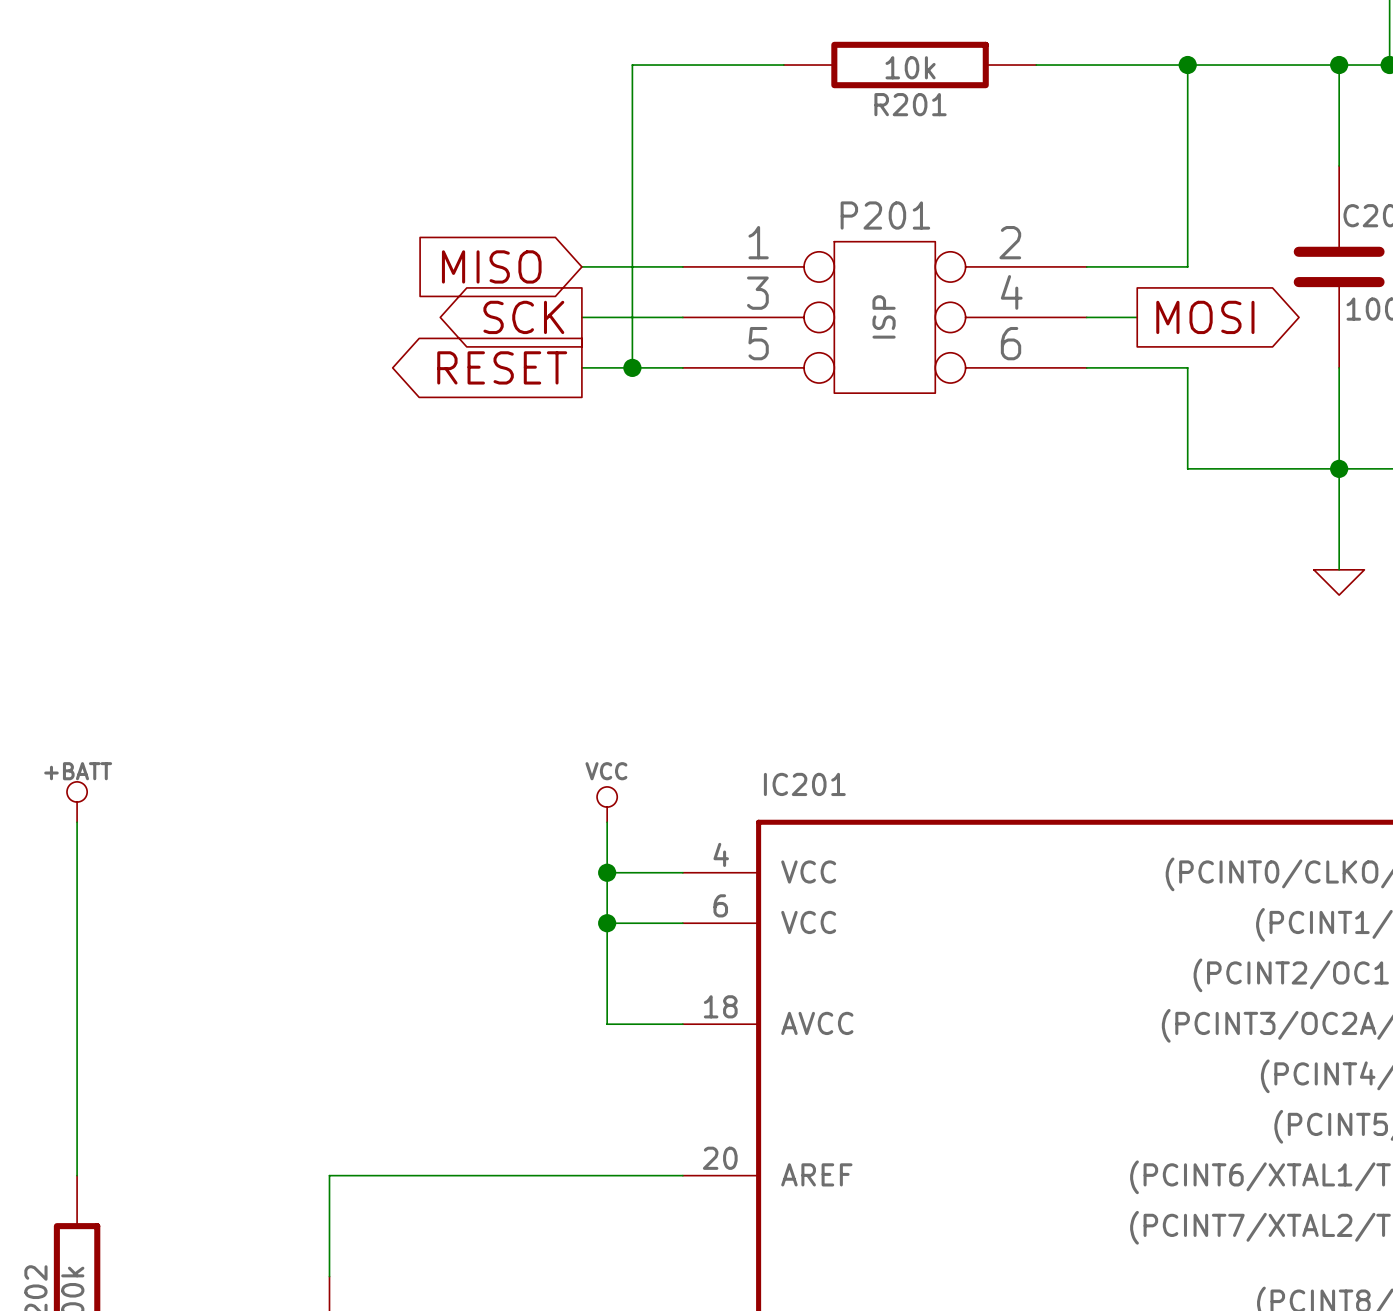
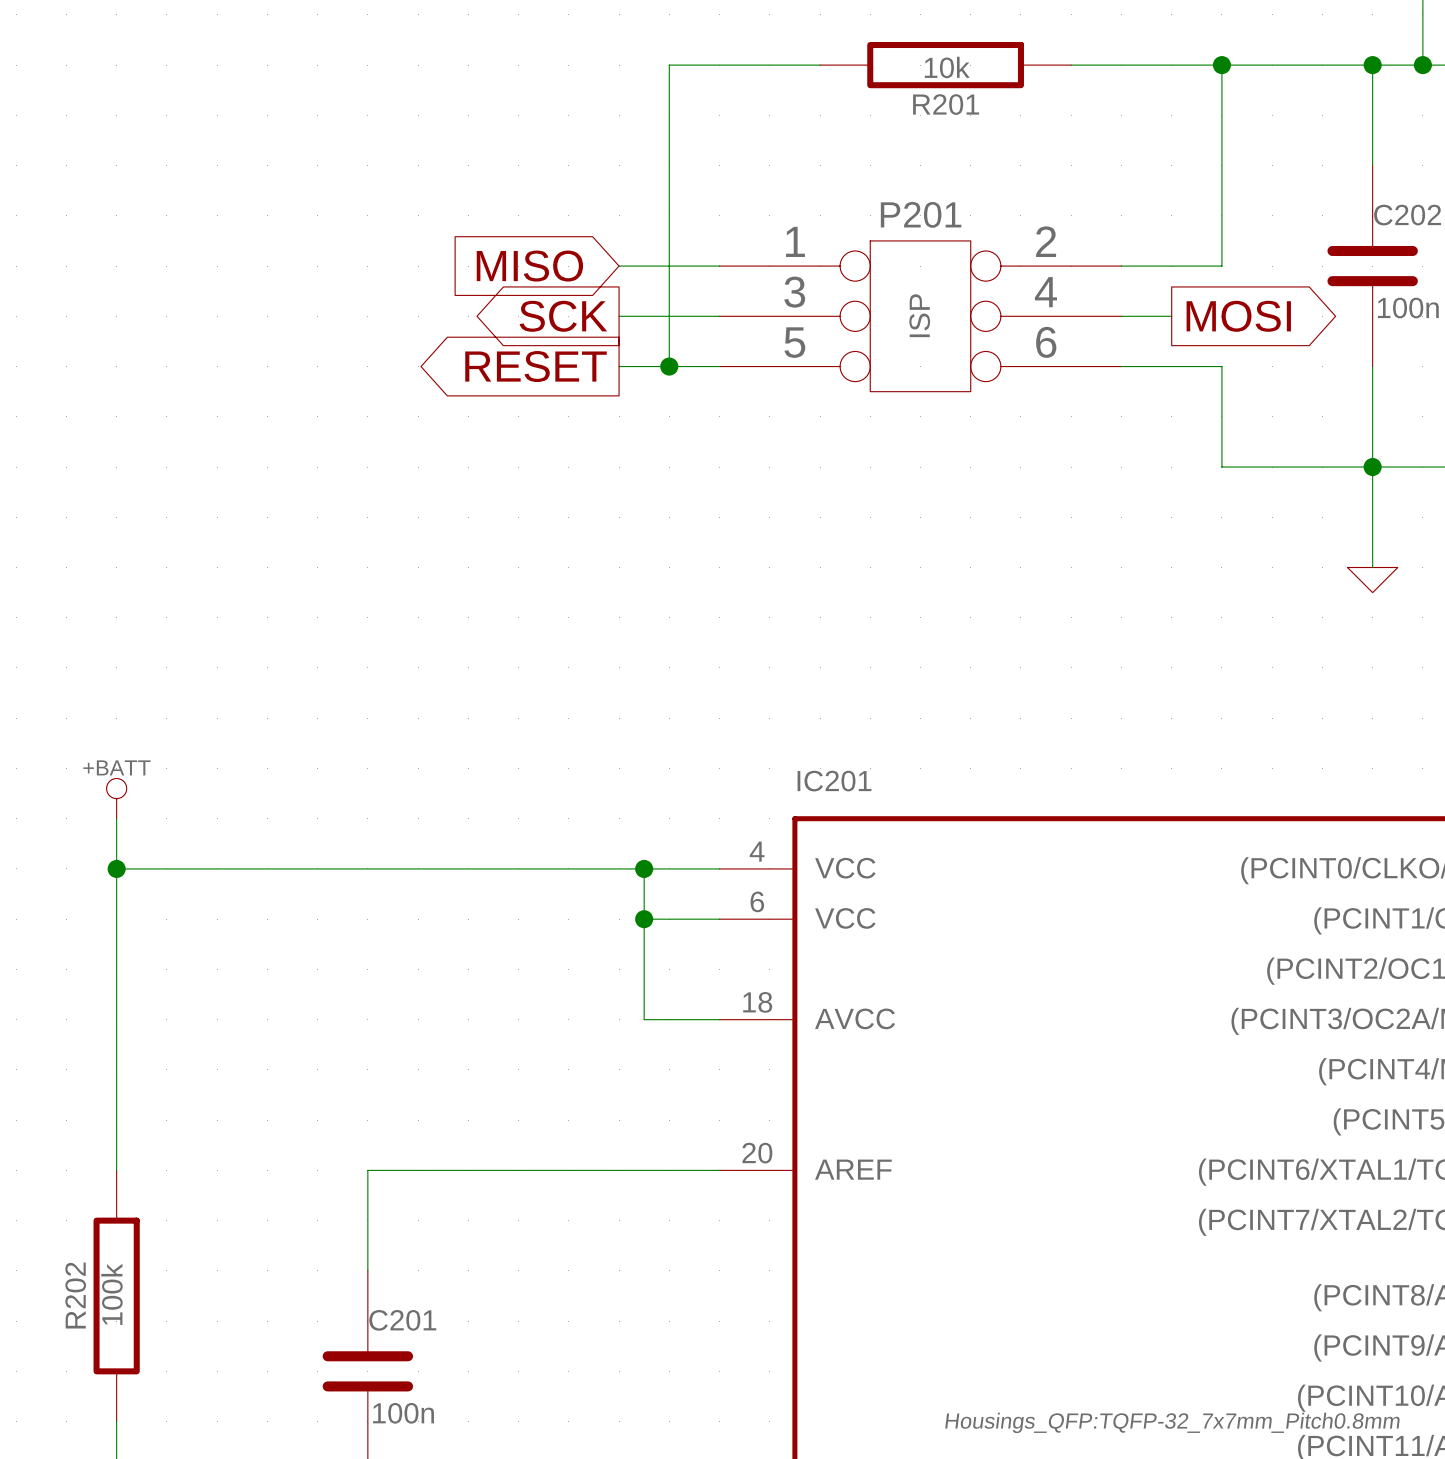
power symbol: VCC (607, 804) -> none
wire: (607, 822) (607, 872) -> (116, 868) (644, 868)
junction: none -> (116, 868)

